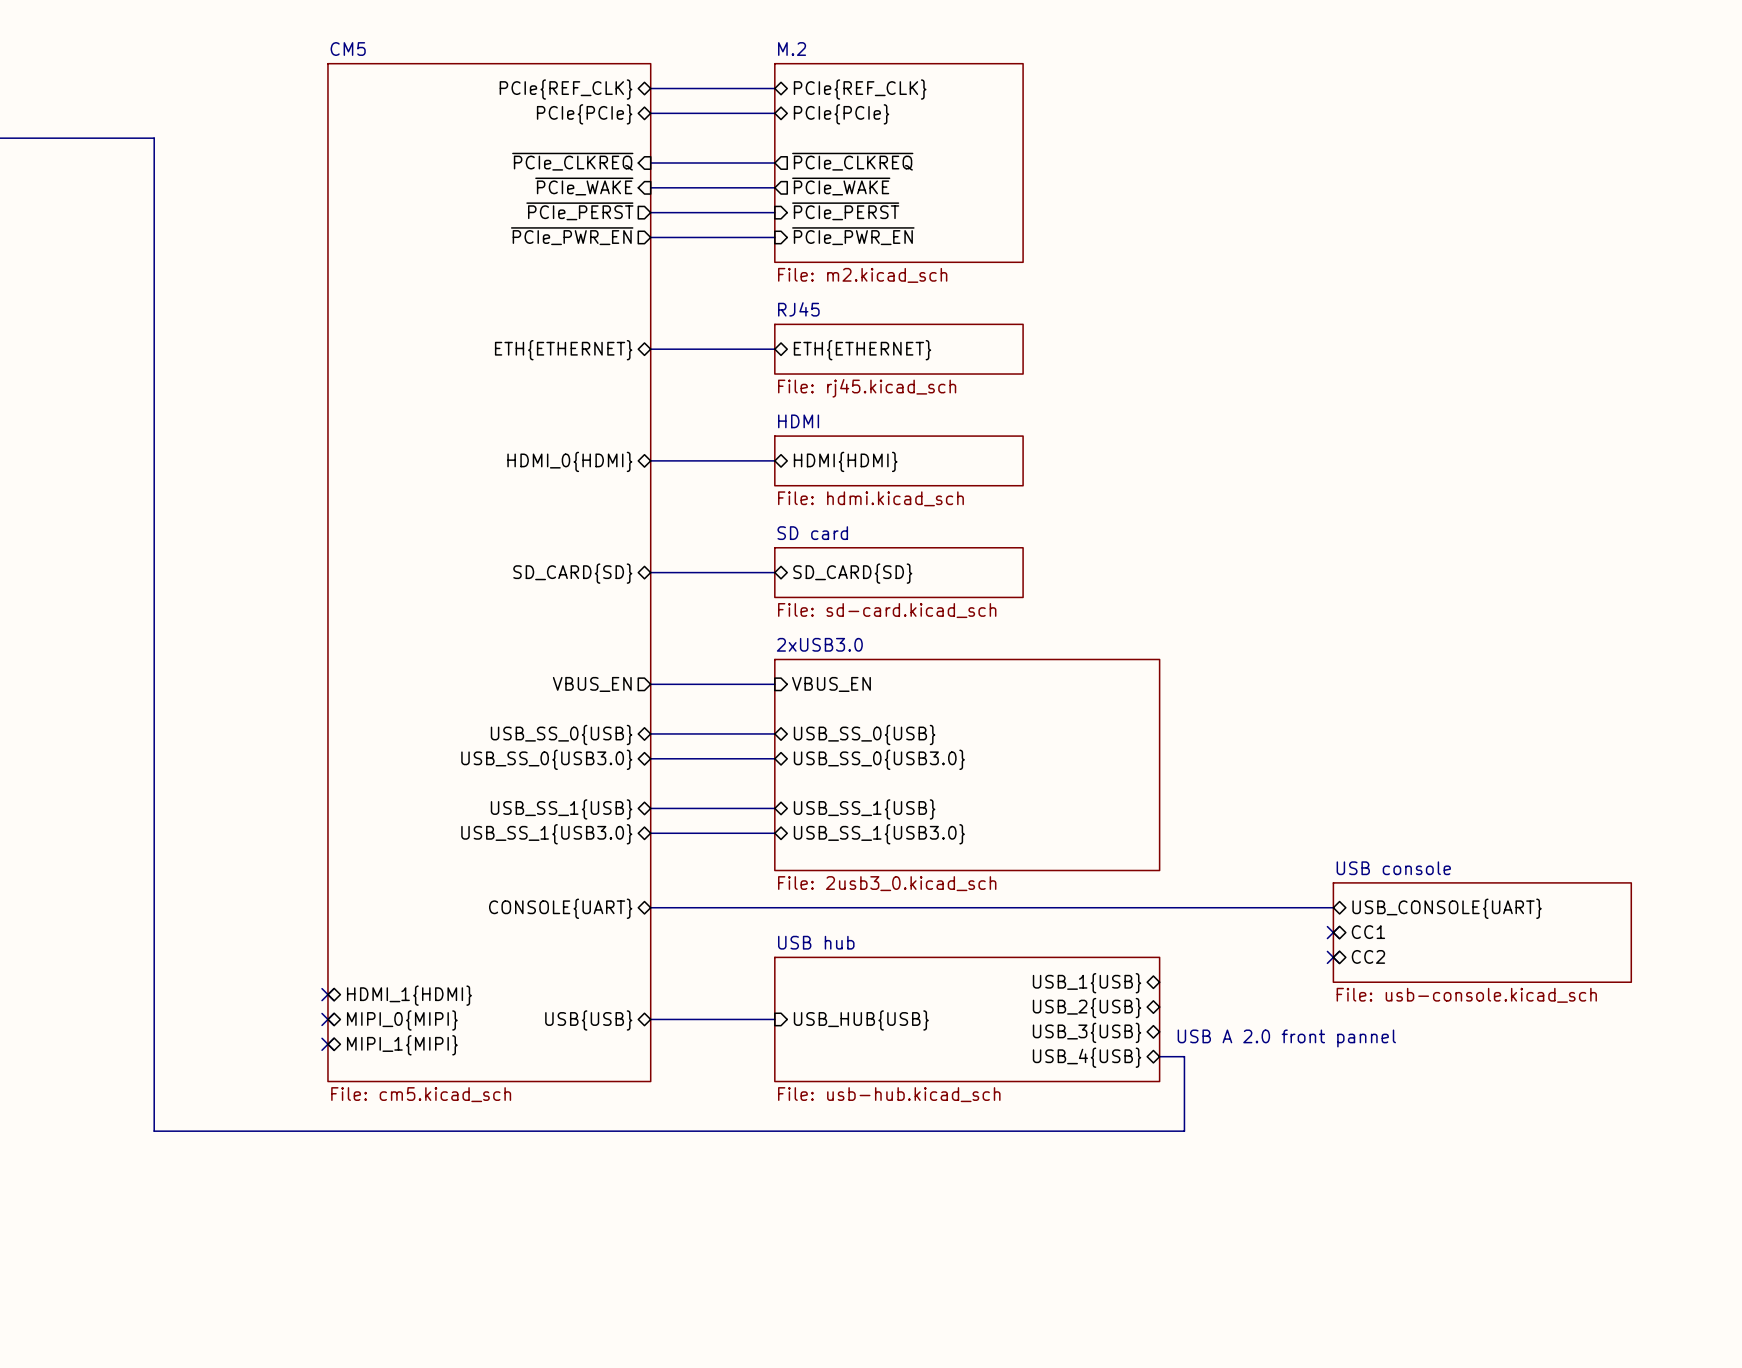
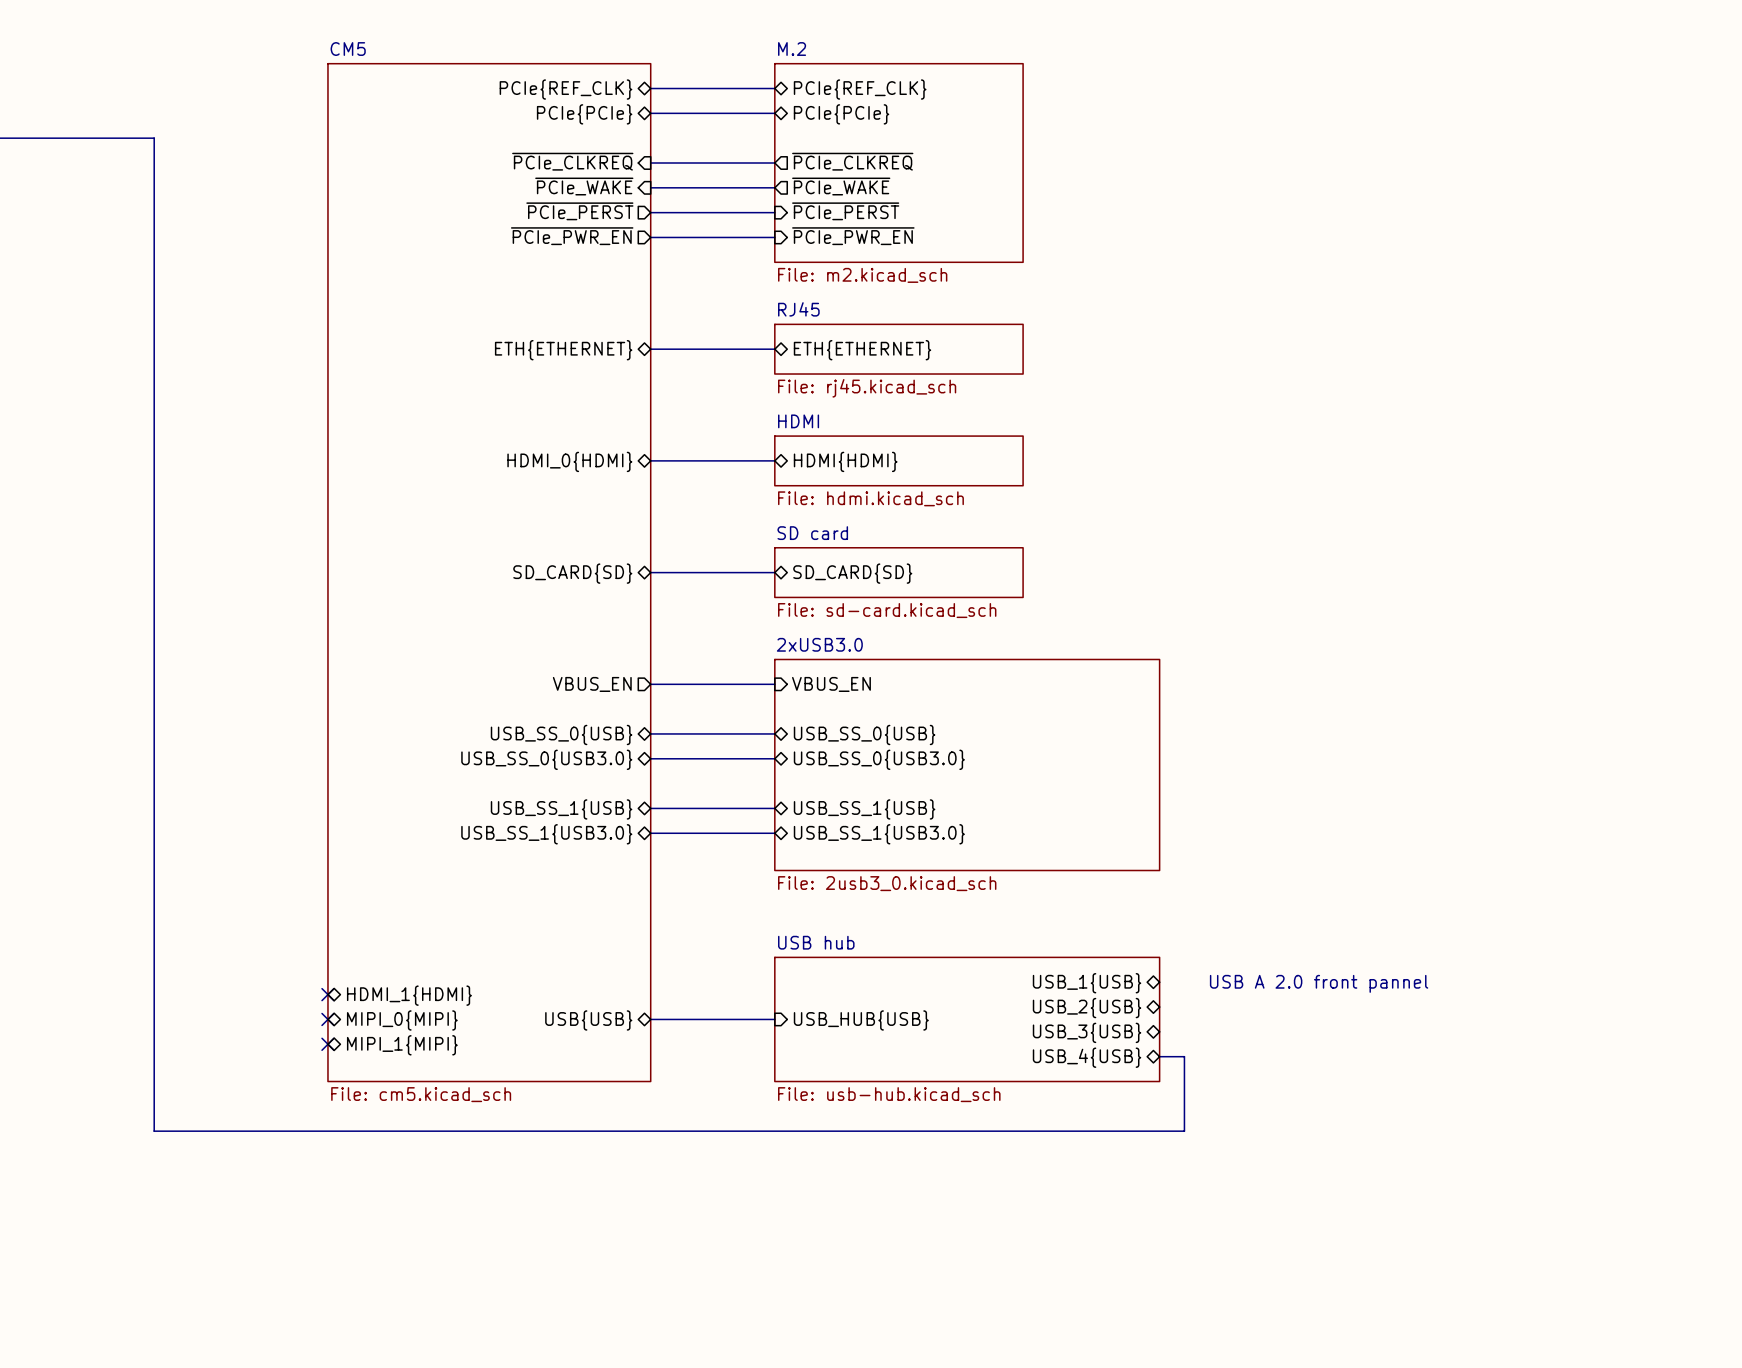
bus: (650, 907) (1333, 907) -> none
sheet pin: CONSOLE{UART} (560, 908) -> none
sheet pin: USB_CONSOLE{UART} (1447, 908) -> none
no-connect mark: (1333, 932) -> none
sheet pin: CC1 (1368, 932) -> none
sheet USB console: File: usb-console.kicad_sch (1482, 932) -> none
sheet pin: CC2 (1368, 956) -> none
no-connect mark: (1333, 957) -> none
text position: USB A 2.0 front pannel (1286, 1038) -> USB A 2.0 front pannel (1319, 983)

